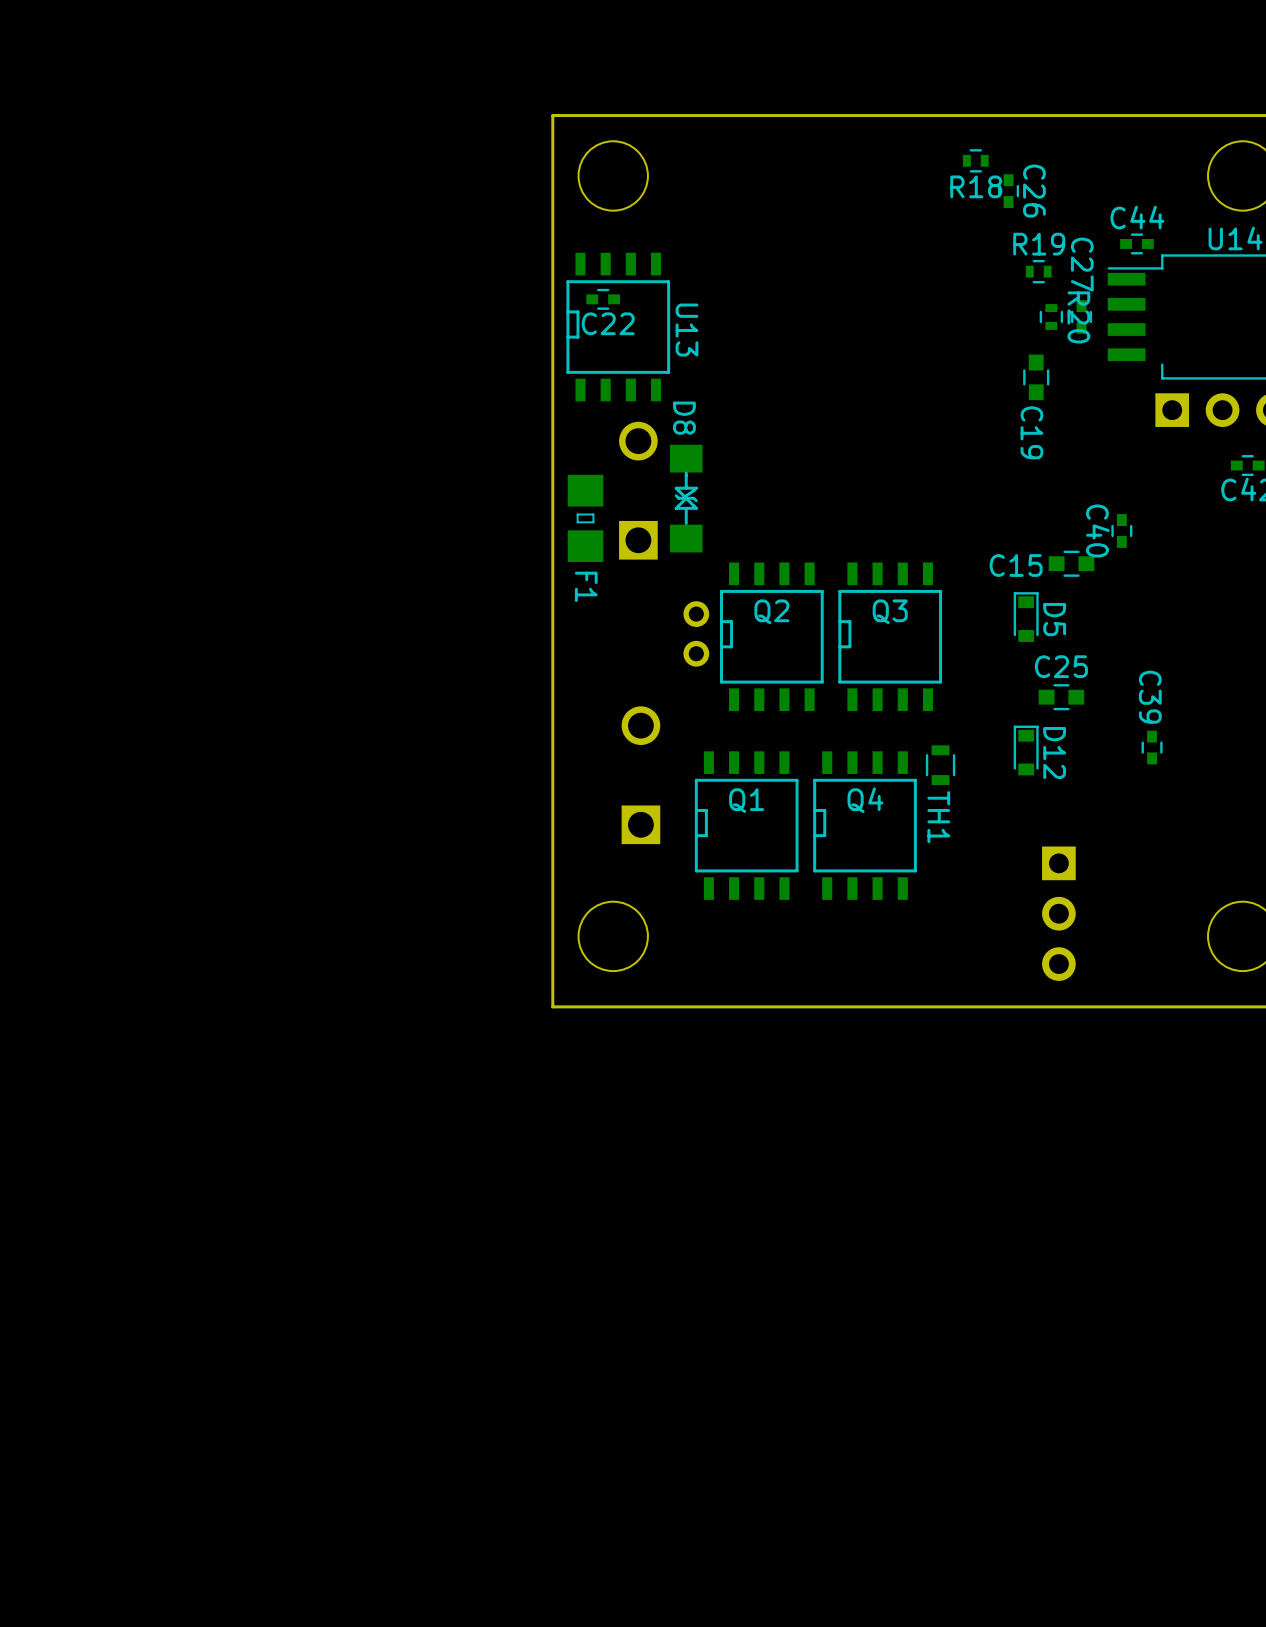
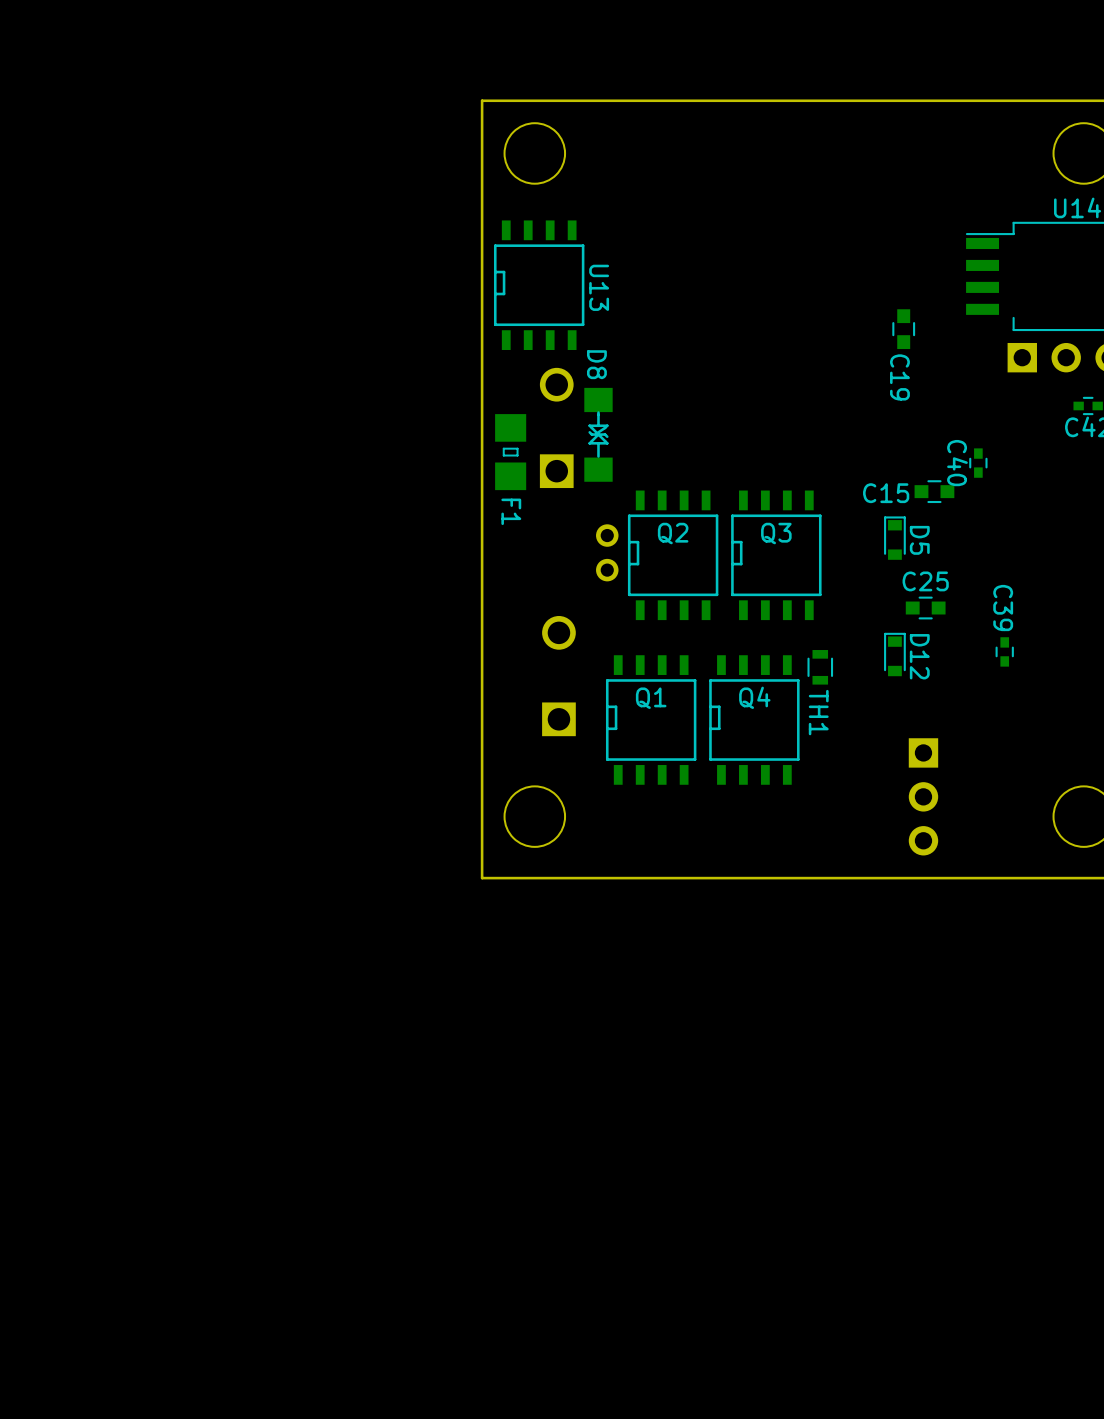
R18: (975, 160) -> none
C26: (1008, 191) -> none
C44: (1136, 243) -> none
R19: (1038, 271) -> none
C22: (603, 299) -> none
R20: (1051, 316) -> none
C27: (1081, 316) -> none

